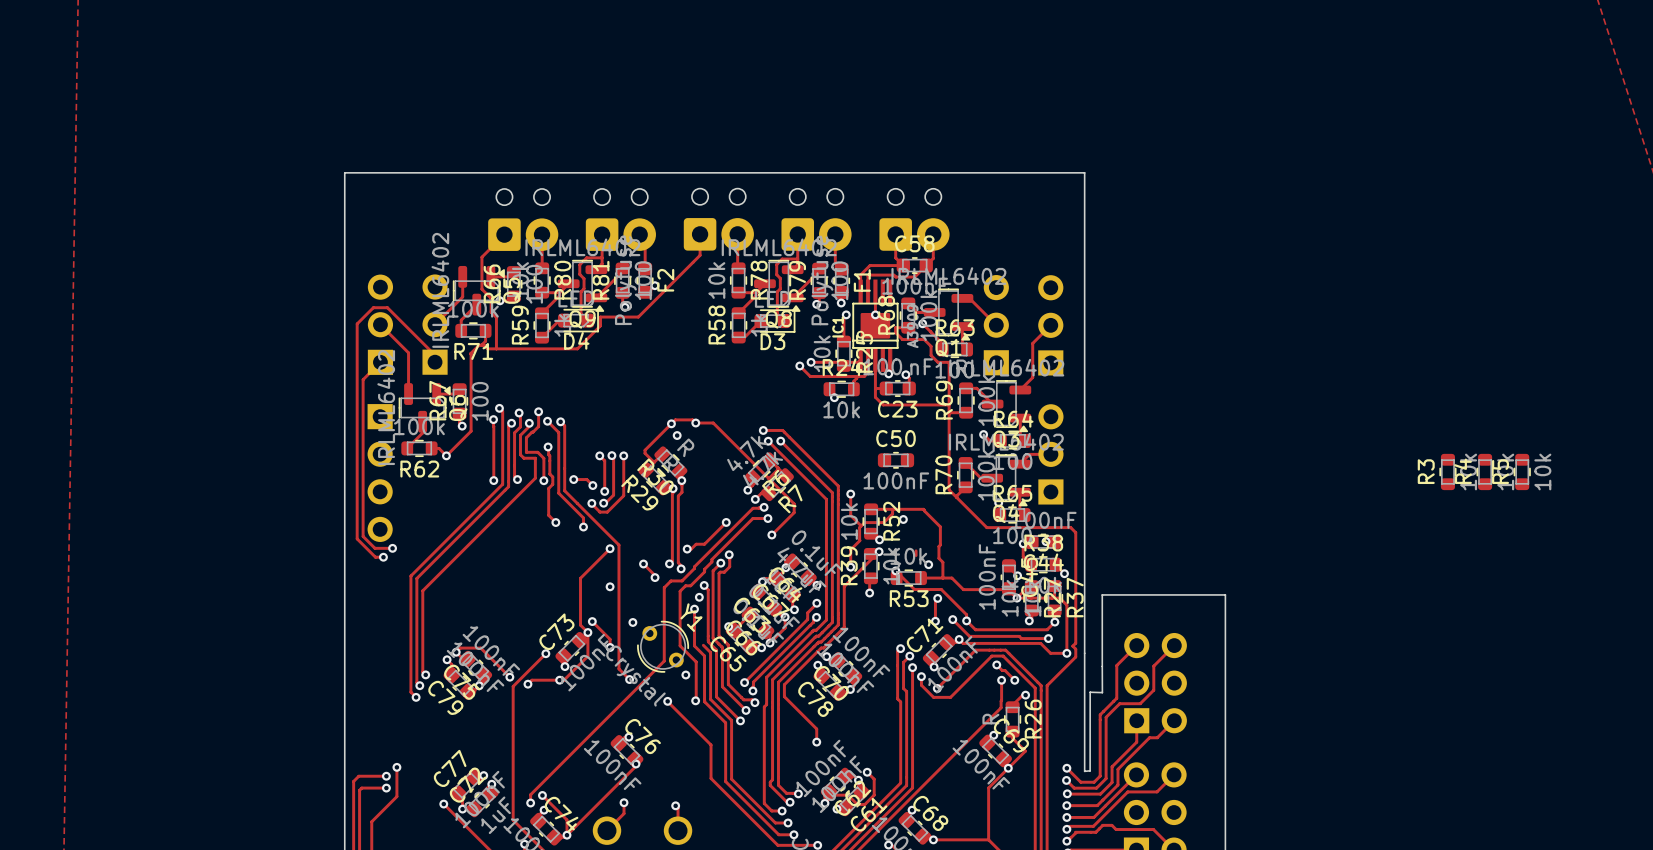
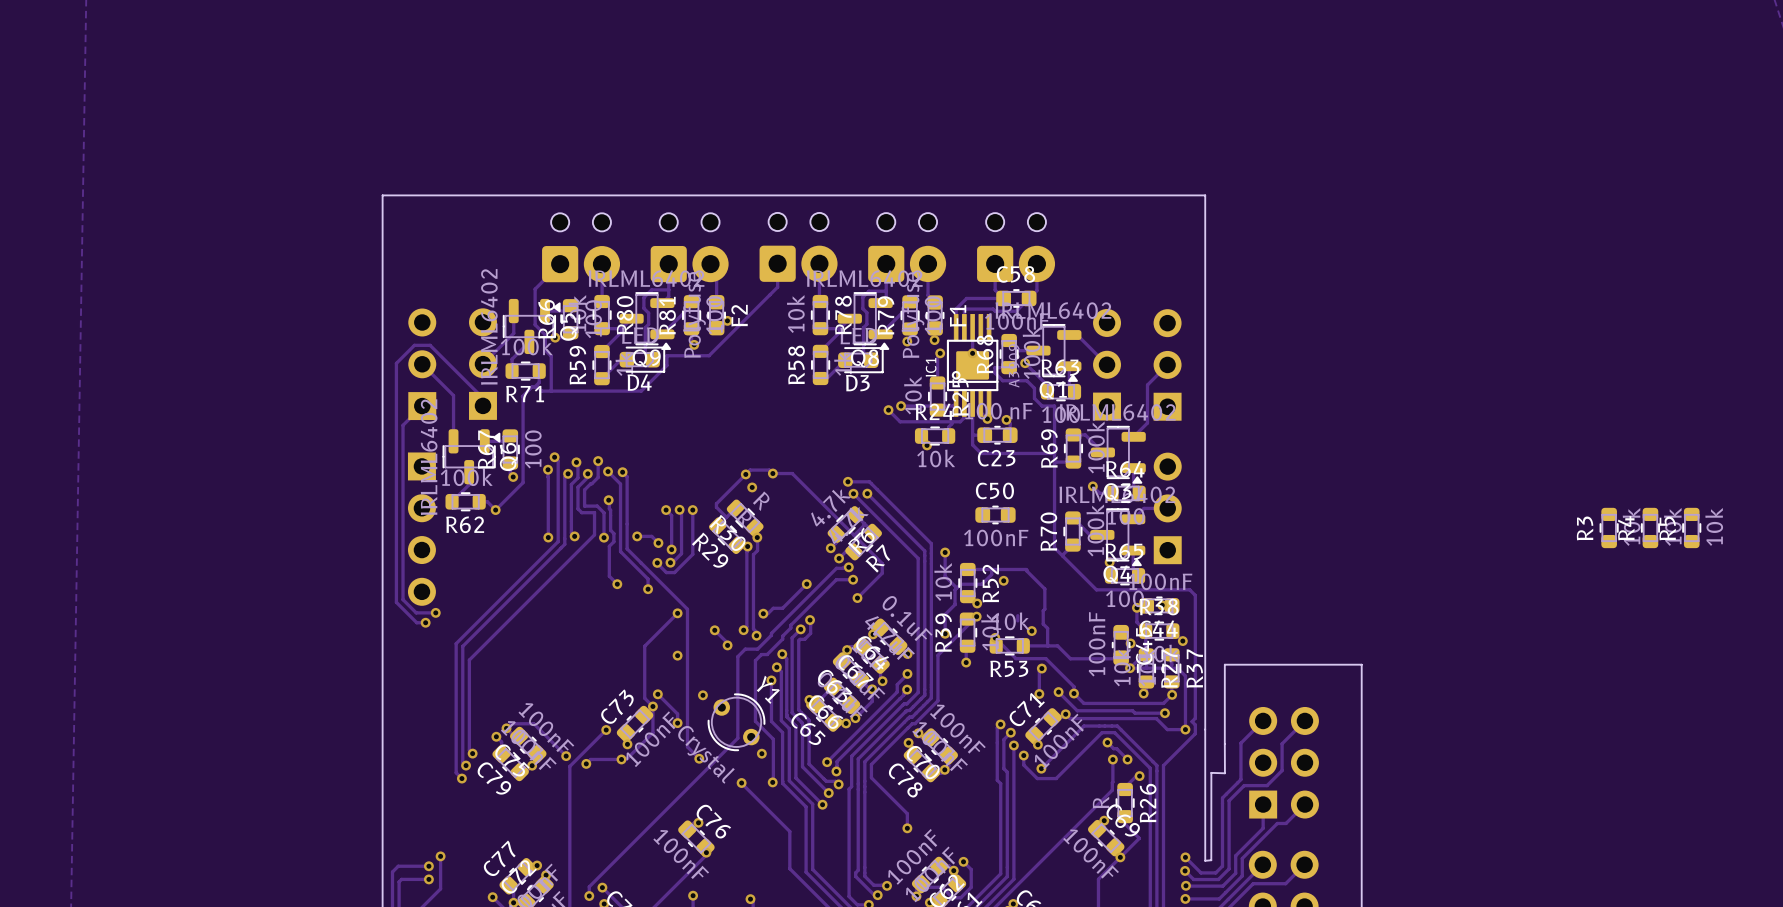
track: none -> (776, 667) (781, 671) (781, 720)

